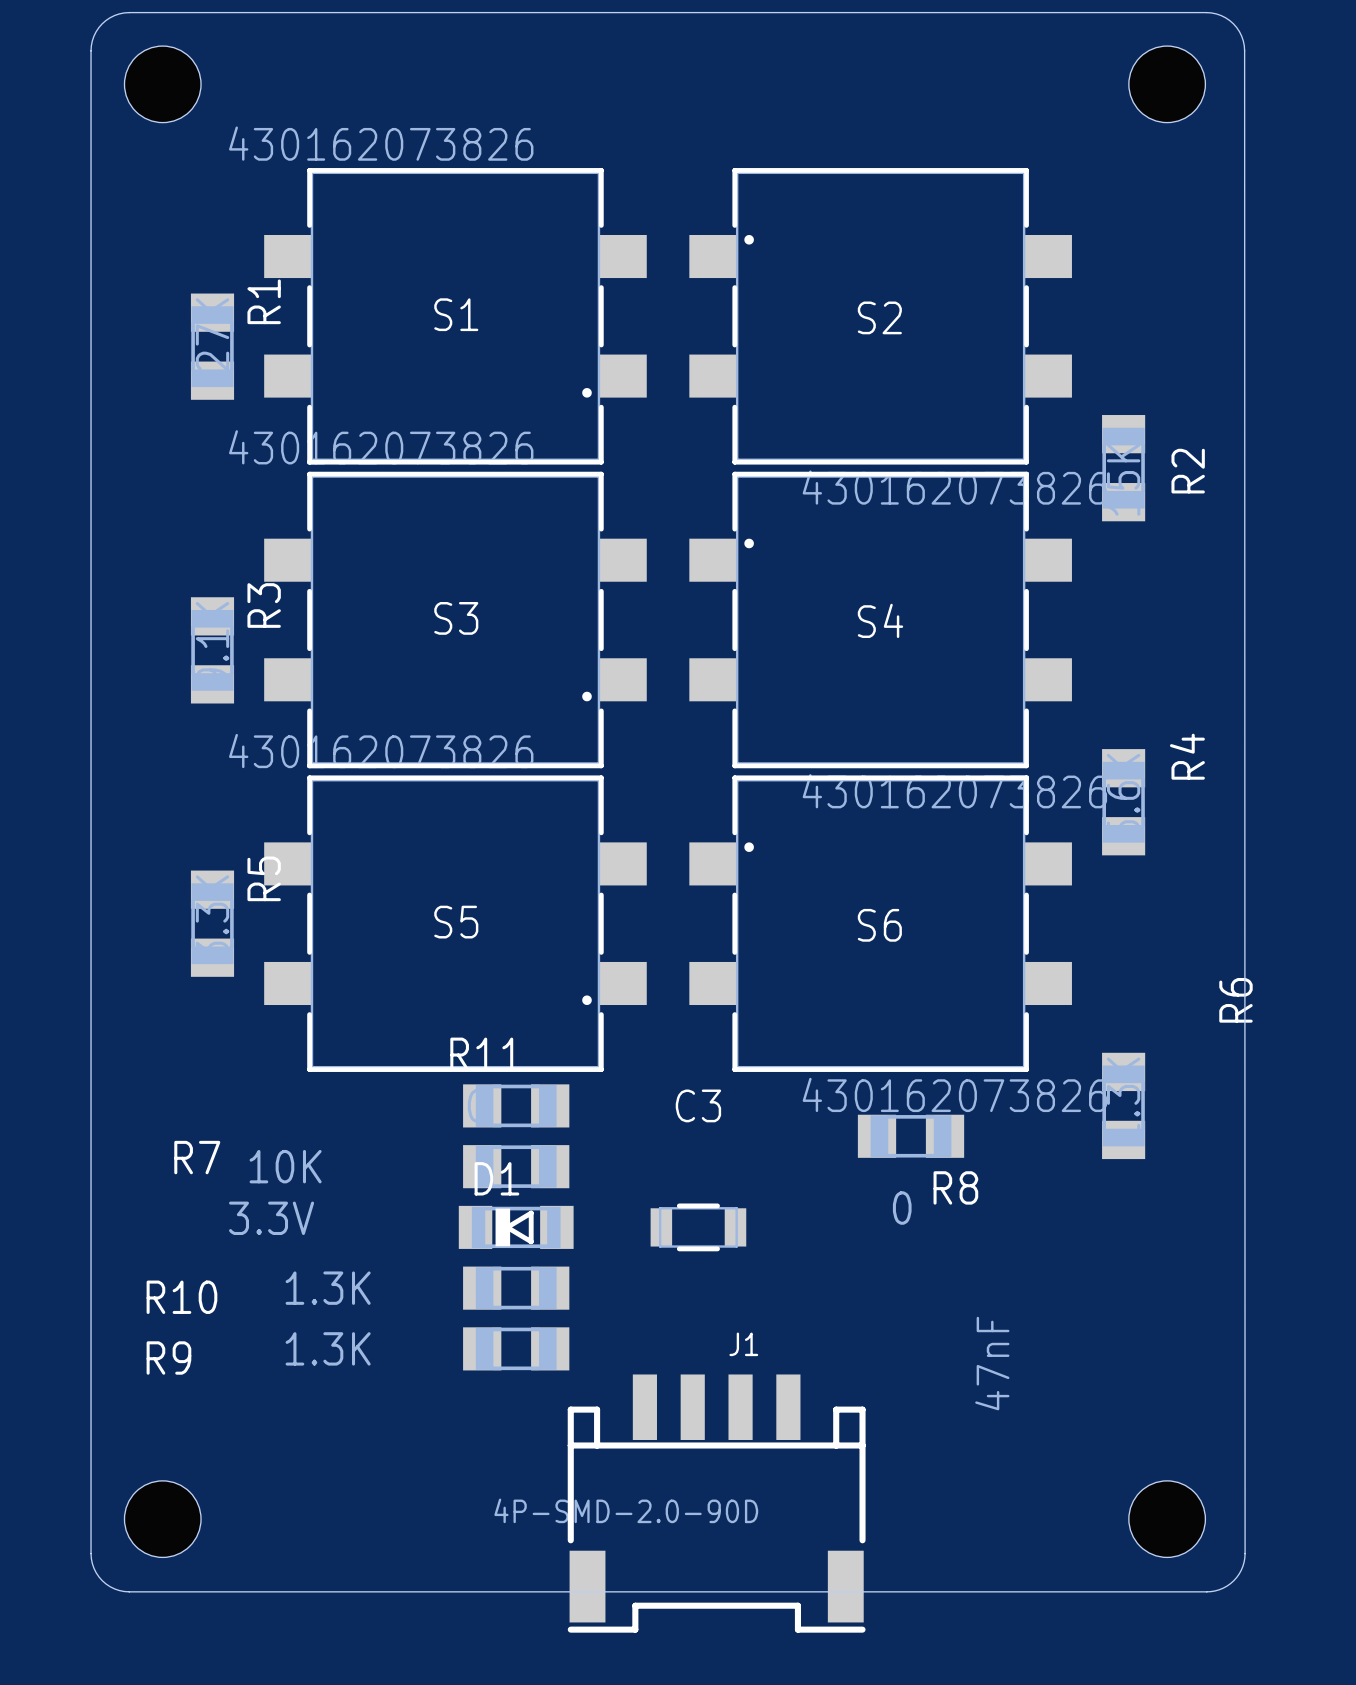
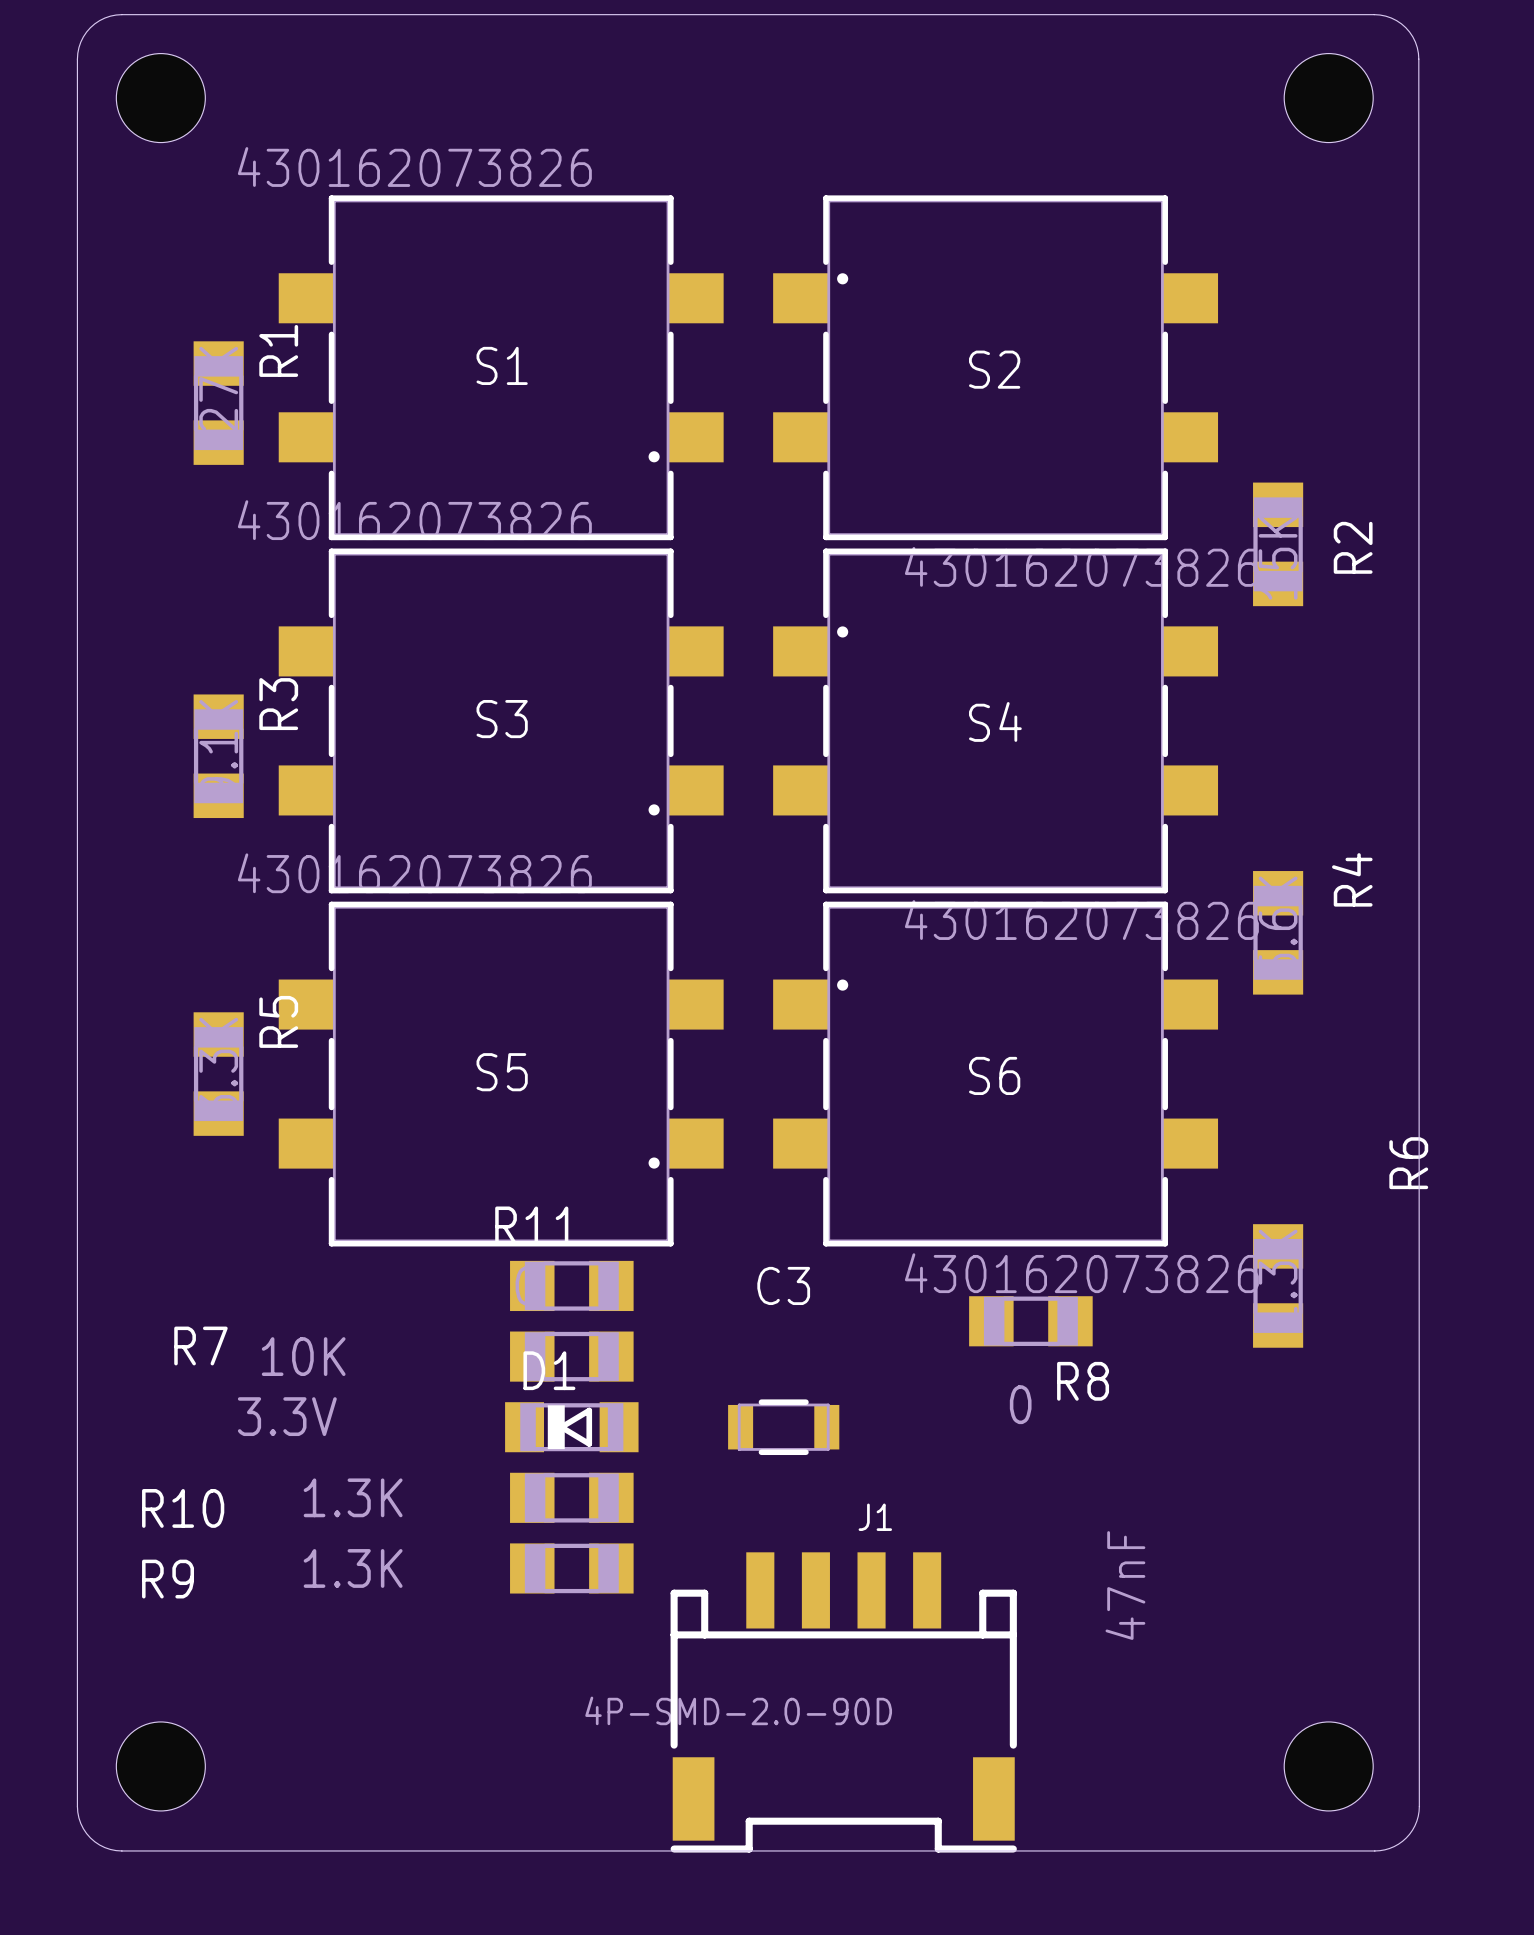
J1 position: (716, 1503) -> (843, 1702)

